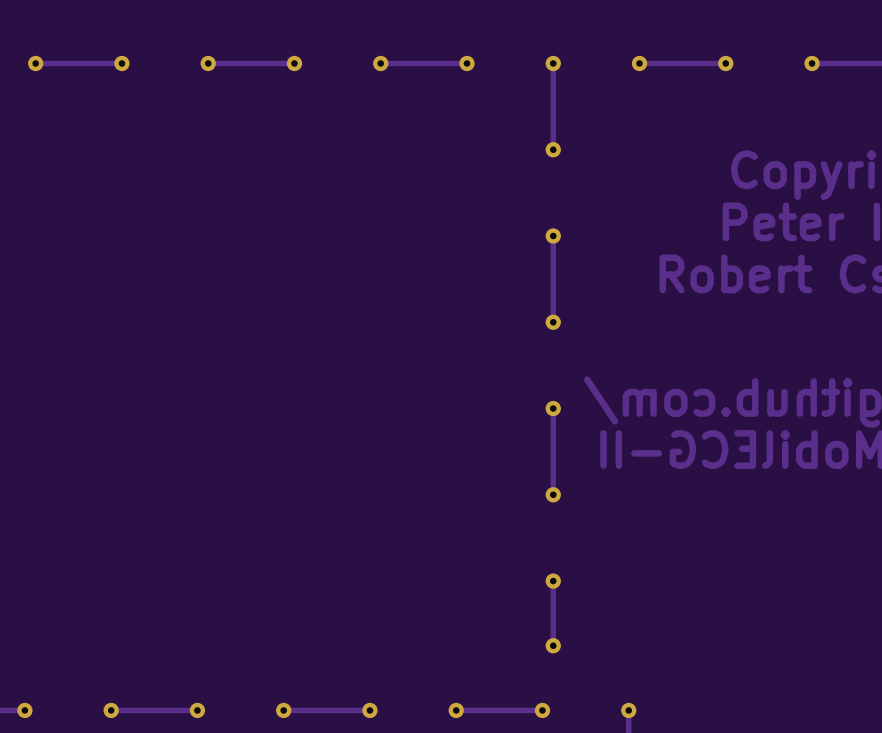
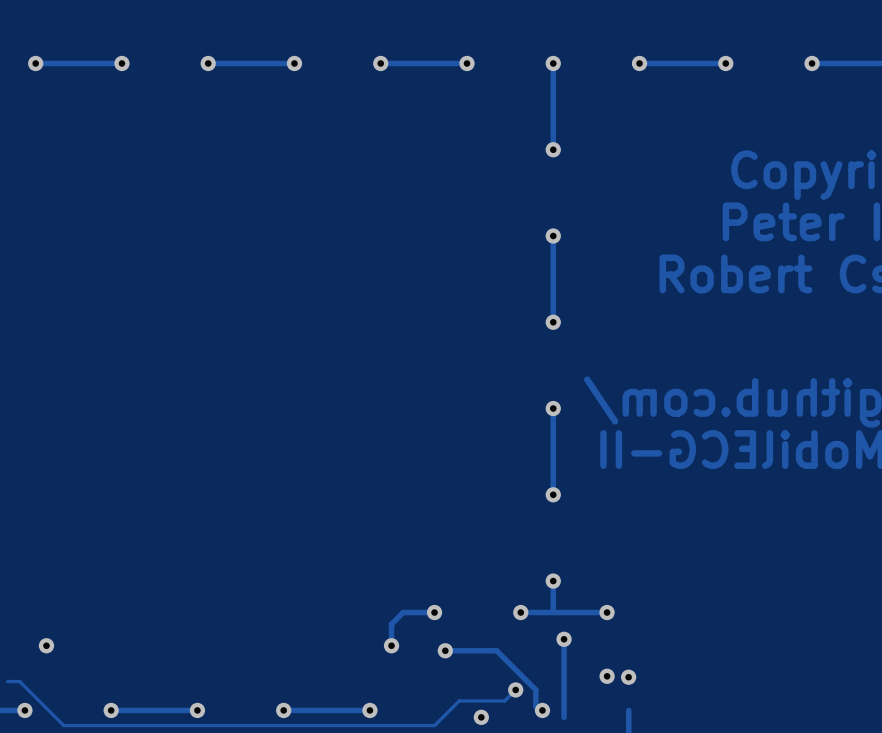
track: none -> (434, 612) (403, 612) (391, 624) (391, 645)
via: none -> (434, 612)
via: none -> (520, 612)
track: (553, 612) (553, 645) -> none
via: none -> (607, 612)
track: none -> (564, 639) (564, 717)
via: none -> (46, 645)
via: none -> (391, 645)
via position: (553, 645) -> (564, 639)
track: none -> (445, 650) (496, 650) (535, 689) (535, 706)
via: none -> (445, 650)
via: none -> (607, 676)
via: none -> (628, 677)
track: none -> (7, 681) (19, 681) (63, 725) (434, 725) (459, 700) (504, 700) (515, 689)
via: none -> (515, 689)
via position: (456, 710) -> (481, 717)
track: (542, 710) (456, 710) -> (607, 612) (520, 612)
via: (628, 710) -> none

